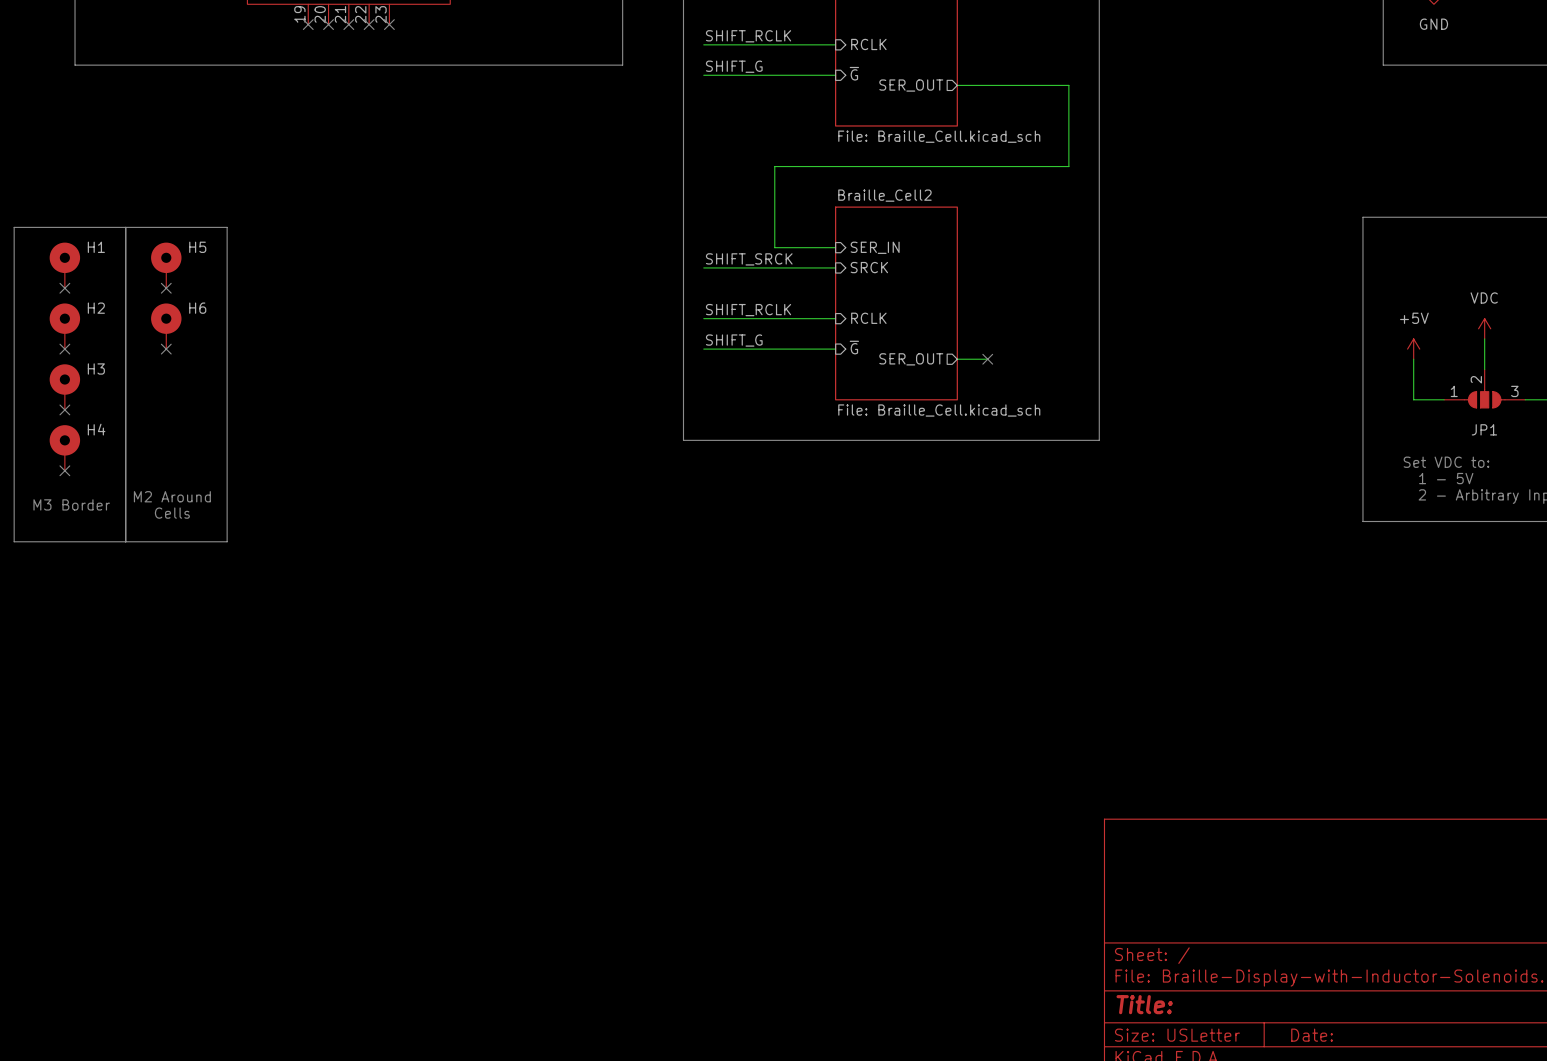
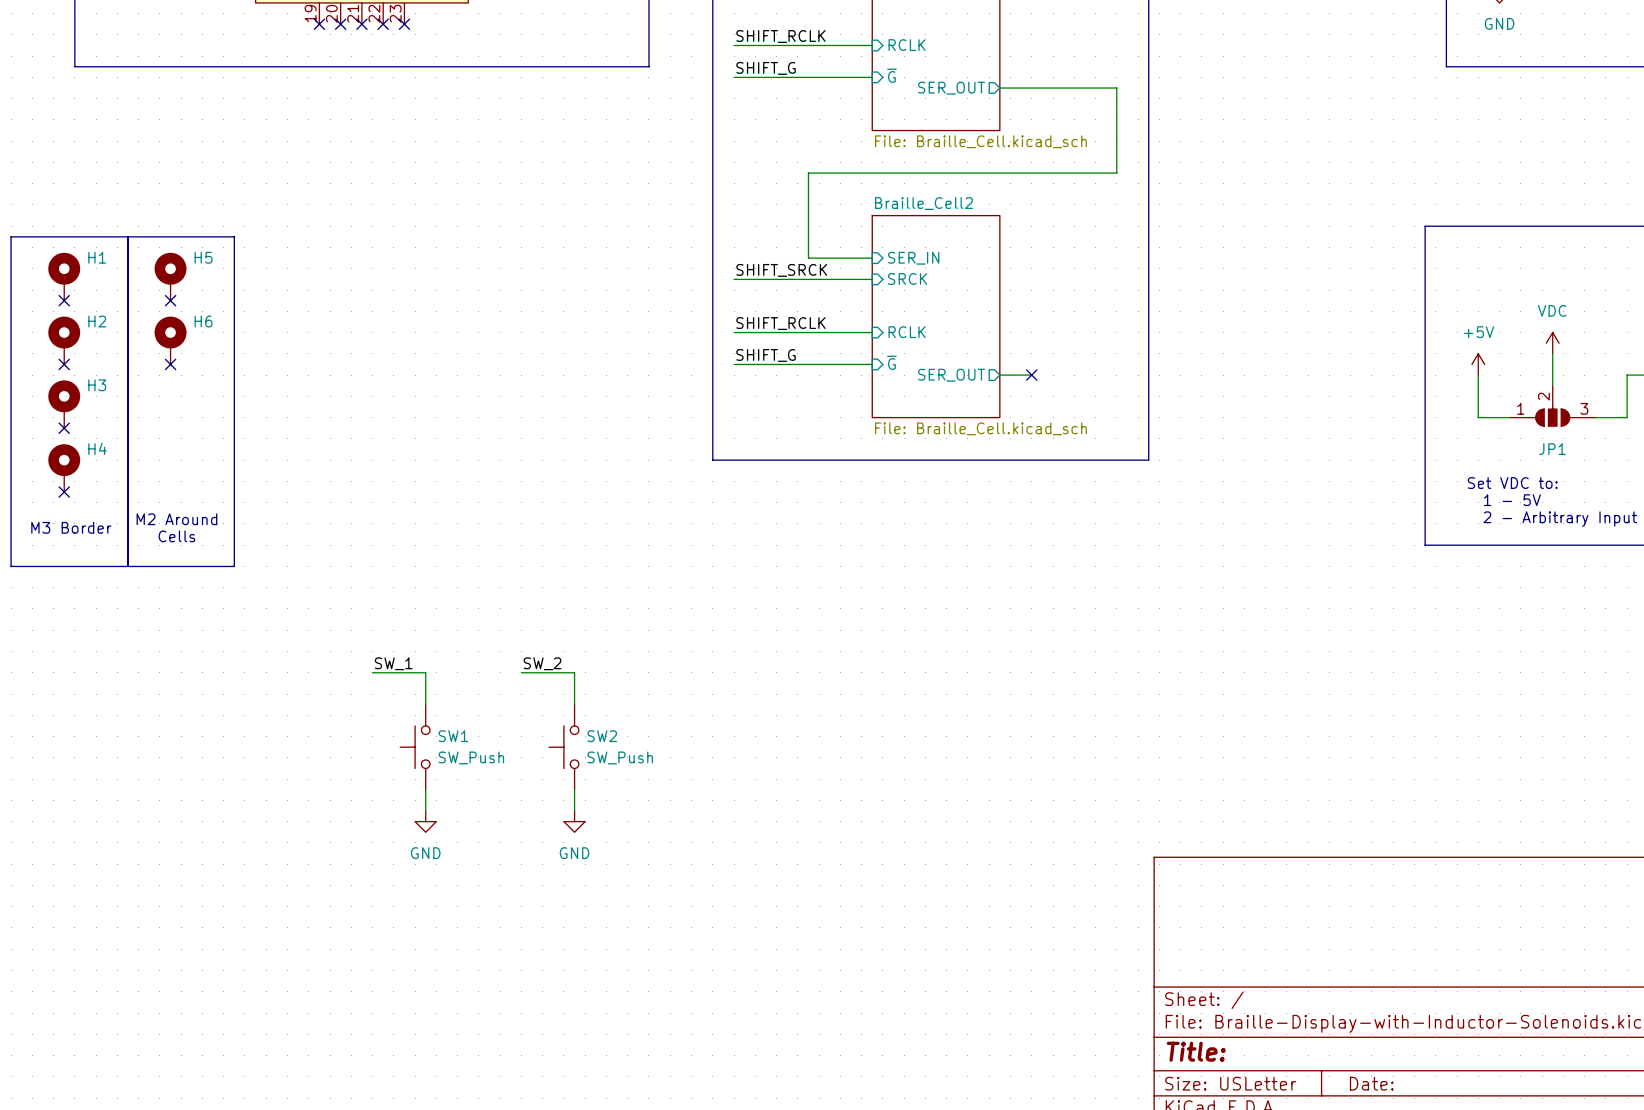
label: none -> SW_1 (393, 663)
label: none -> SW_2 (542, 663)
wire: none -> (372, 672) (425, 672) (425, 704)
wire: none -> (521, 672) (574, 672) (574, 704)
SW1: none -> SW_Push (415, 747)
SW2: none -> SW_Push (563, 747)
wire: none -> (425, 789) (425, 810)
wire: none -> (574, 789) (574, 810)
power symbol: none -> GND (425, 821)
power symbol: none -> GND (574, 821)

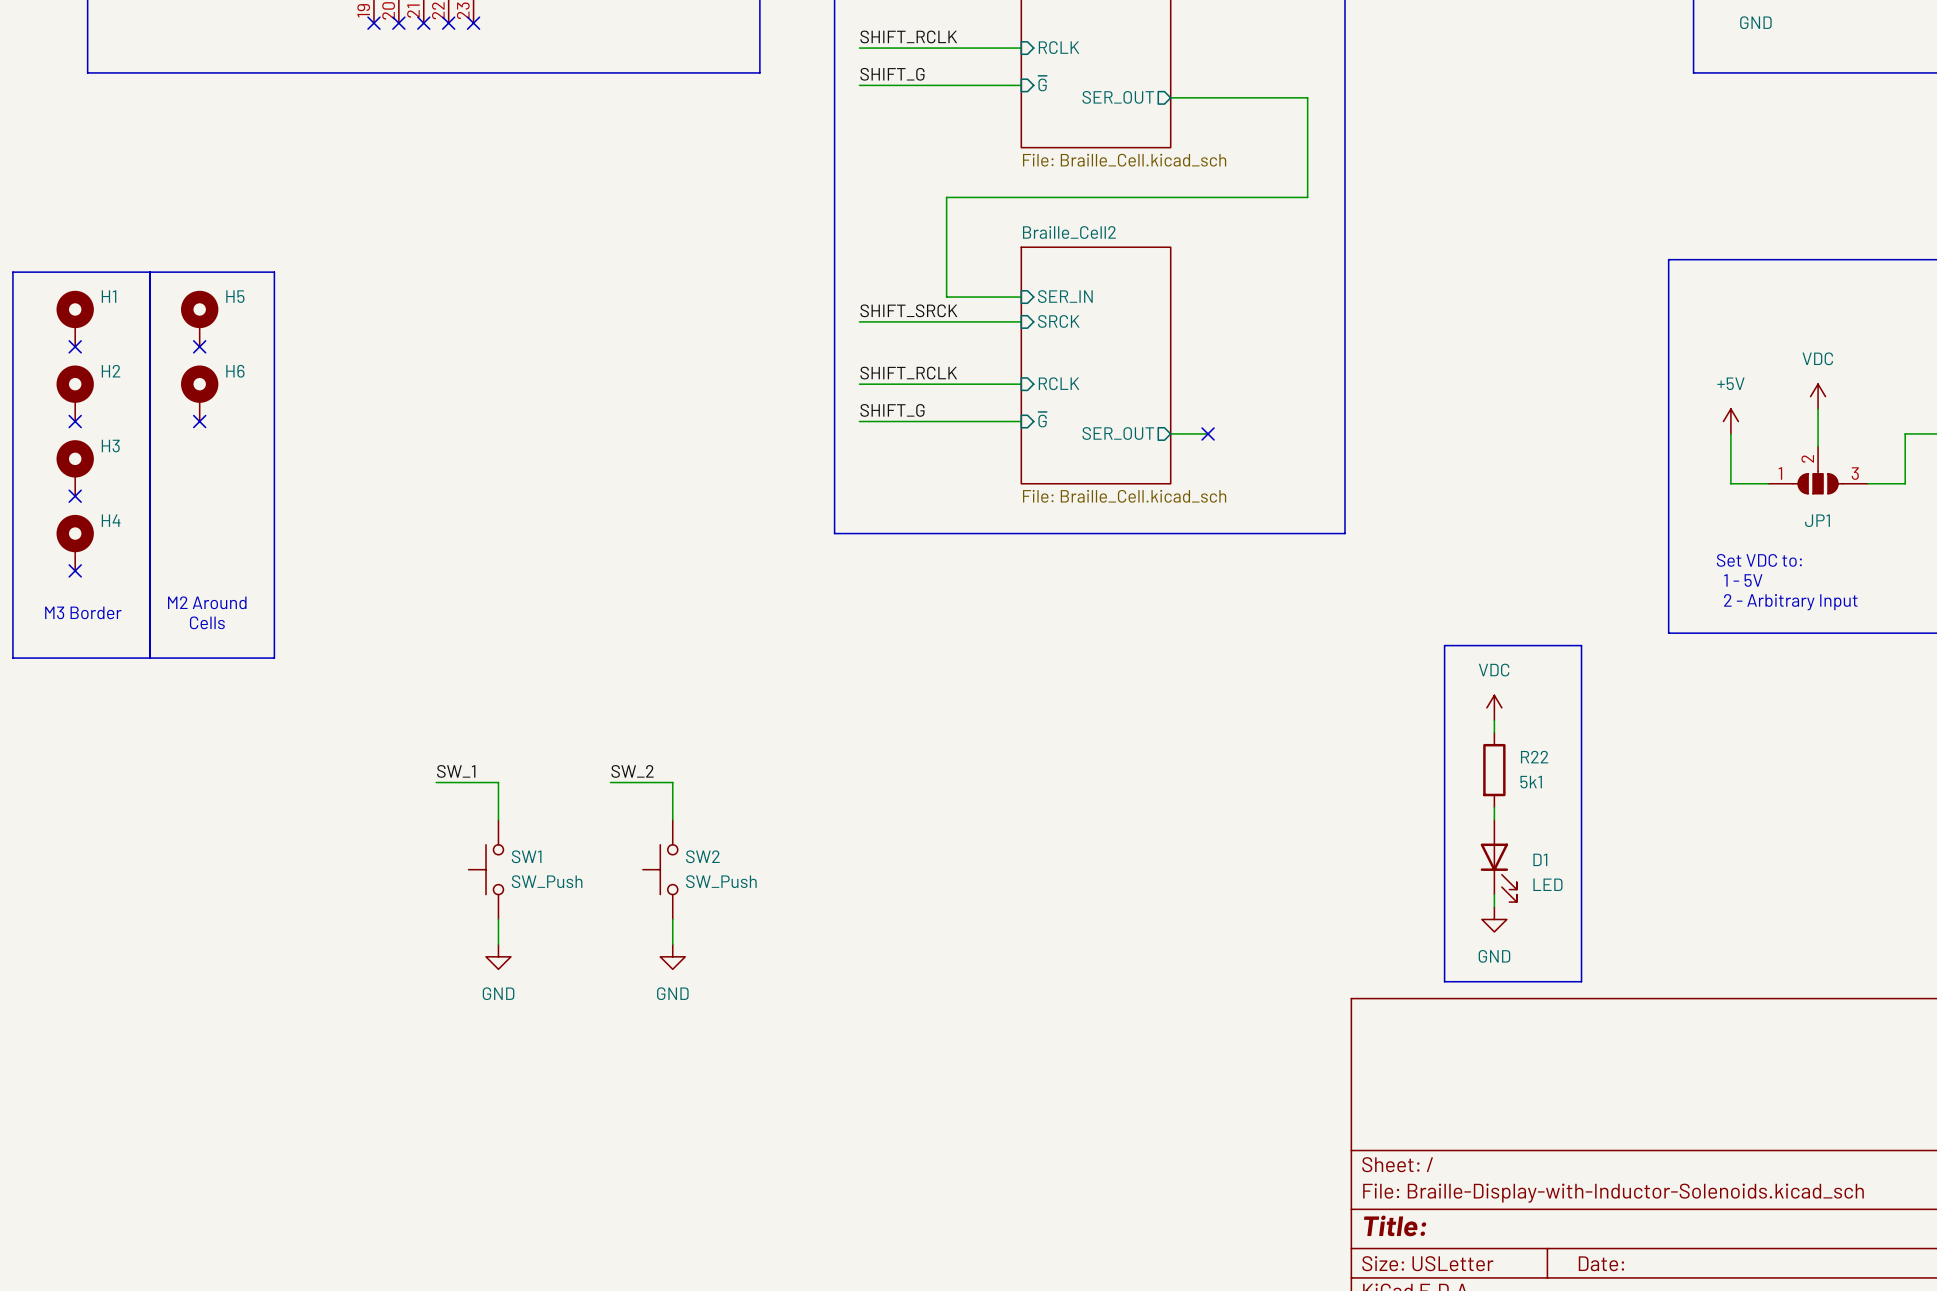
line: none -> (1444, 645) (1581, 645) (1581, 981) (1444, 981) (1444, 645)
power symbol: none -> VDC (1494, 707)
wire: none -> (1494, 720) (1494, 732)
R22: none -> 5k1 (1494, 770)
wire: none -> (1494, 807) (1494, 819)
D1: none -> LED (1498, 860)
wire: none -> (1494, 894) (1494, 907)
power symbol: none -> GND (1494, 919)

